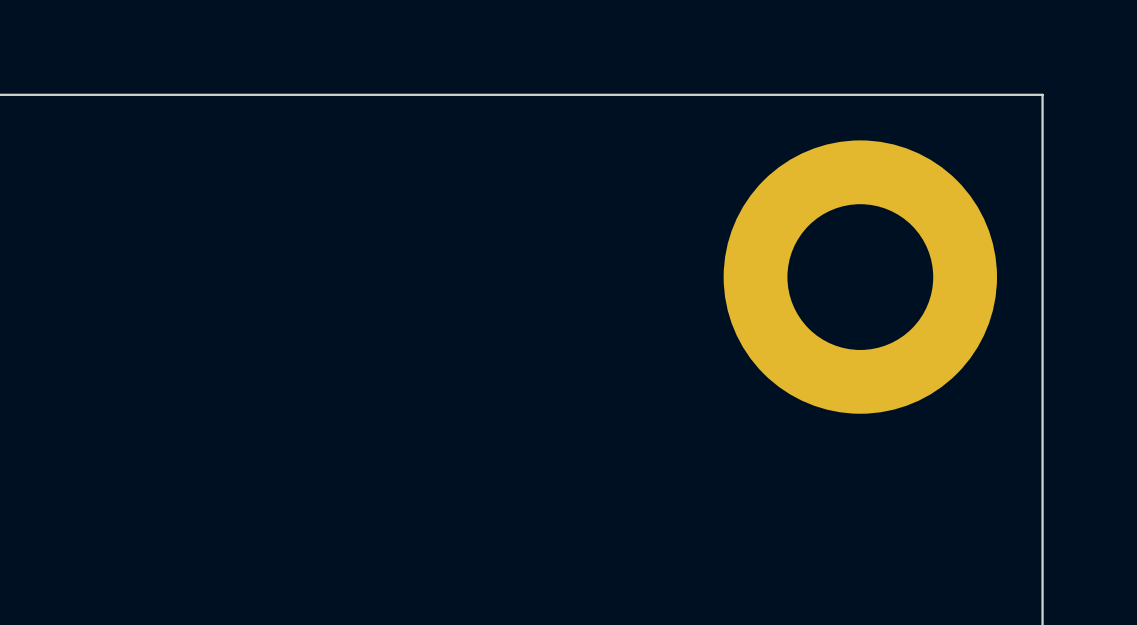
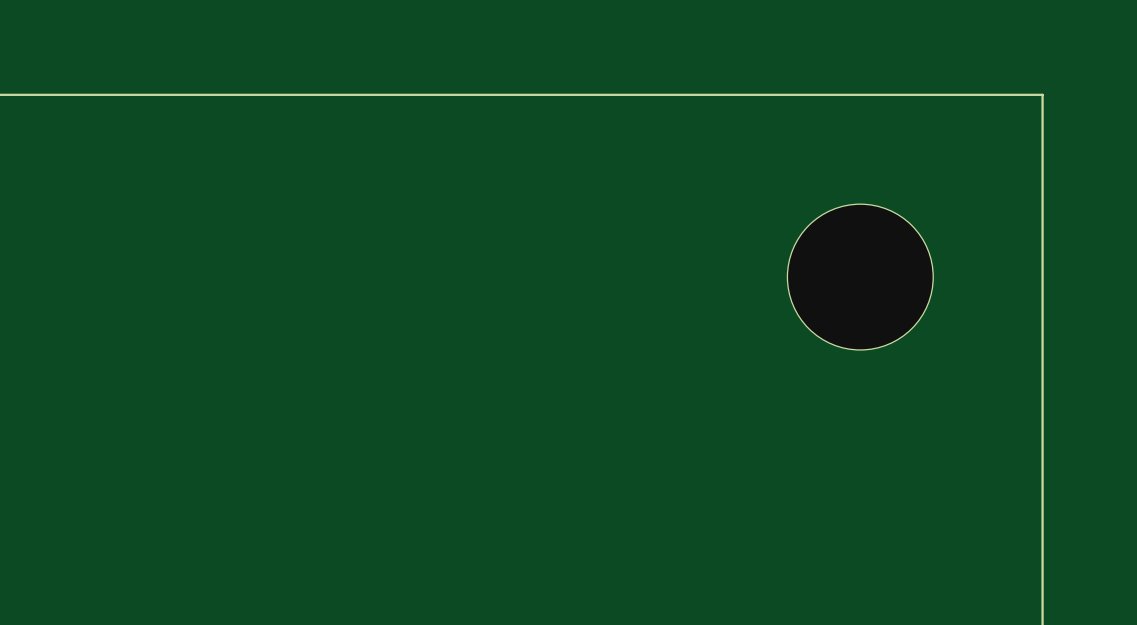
part footprint: [723, 140, 998, 414] -> [787, 204, 934, 350]

